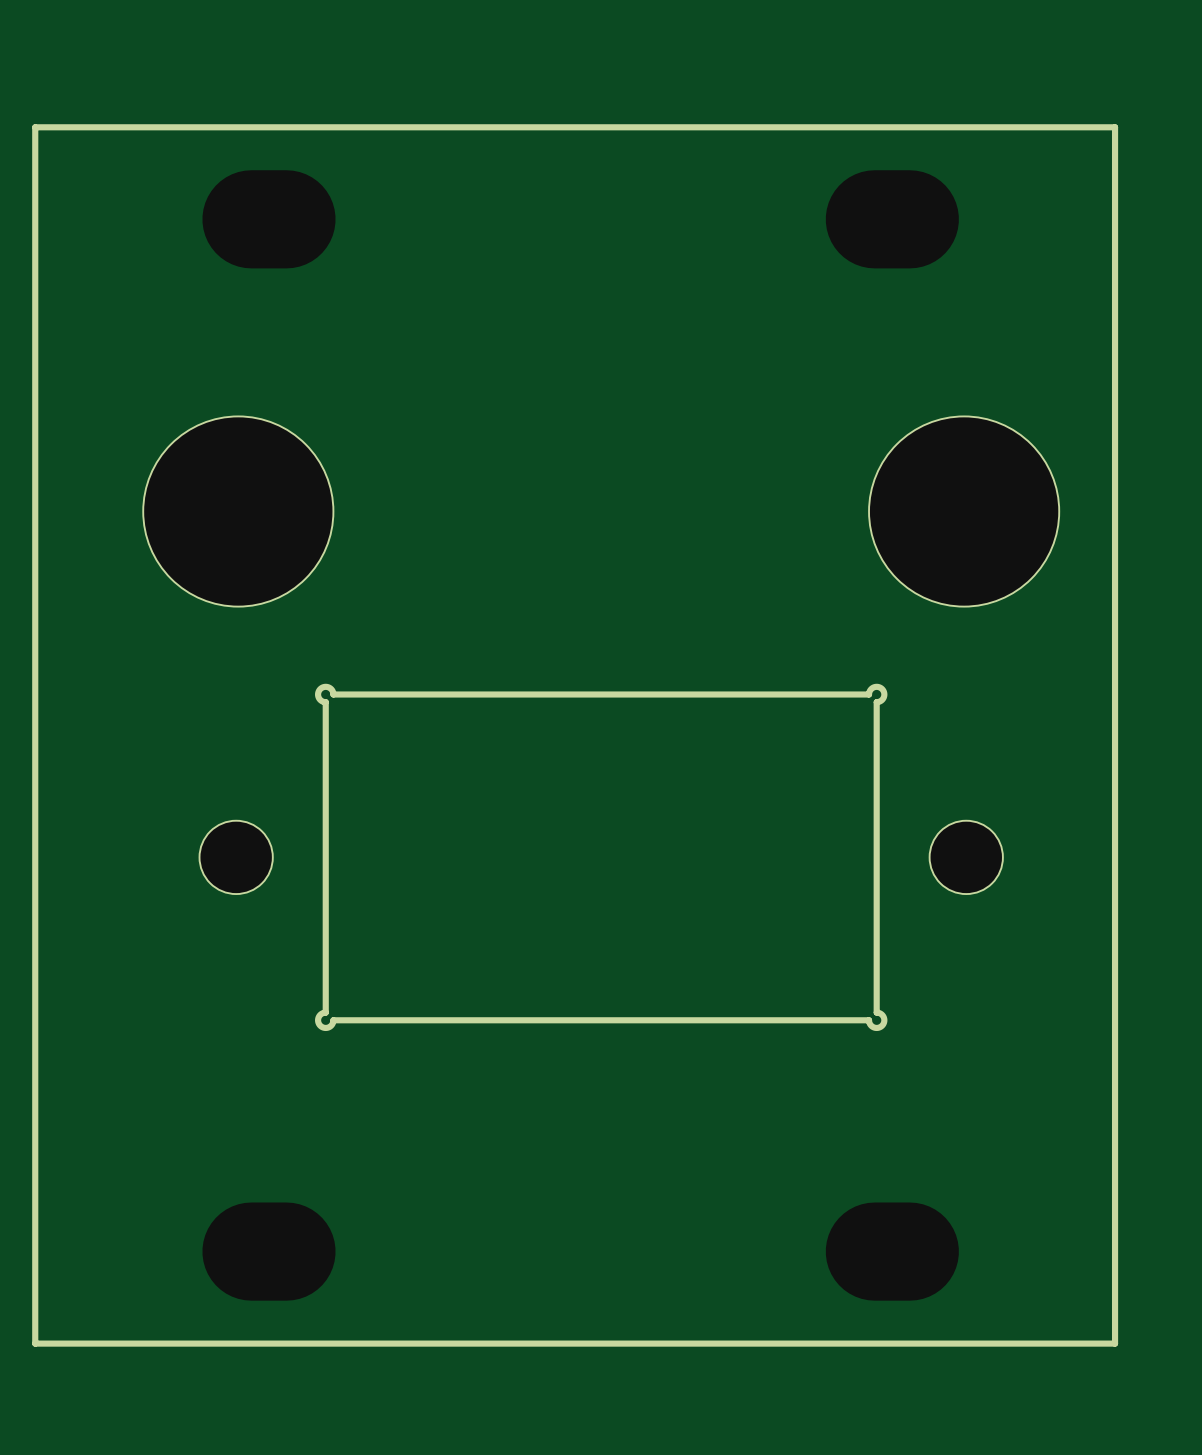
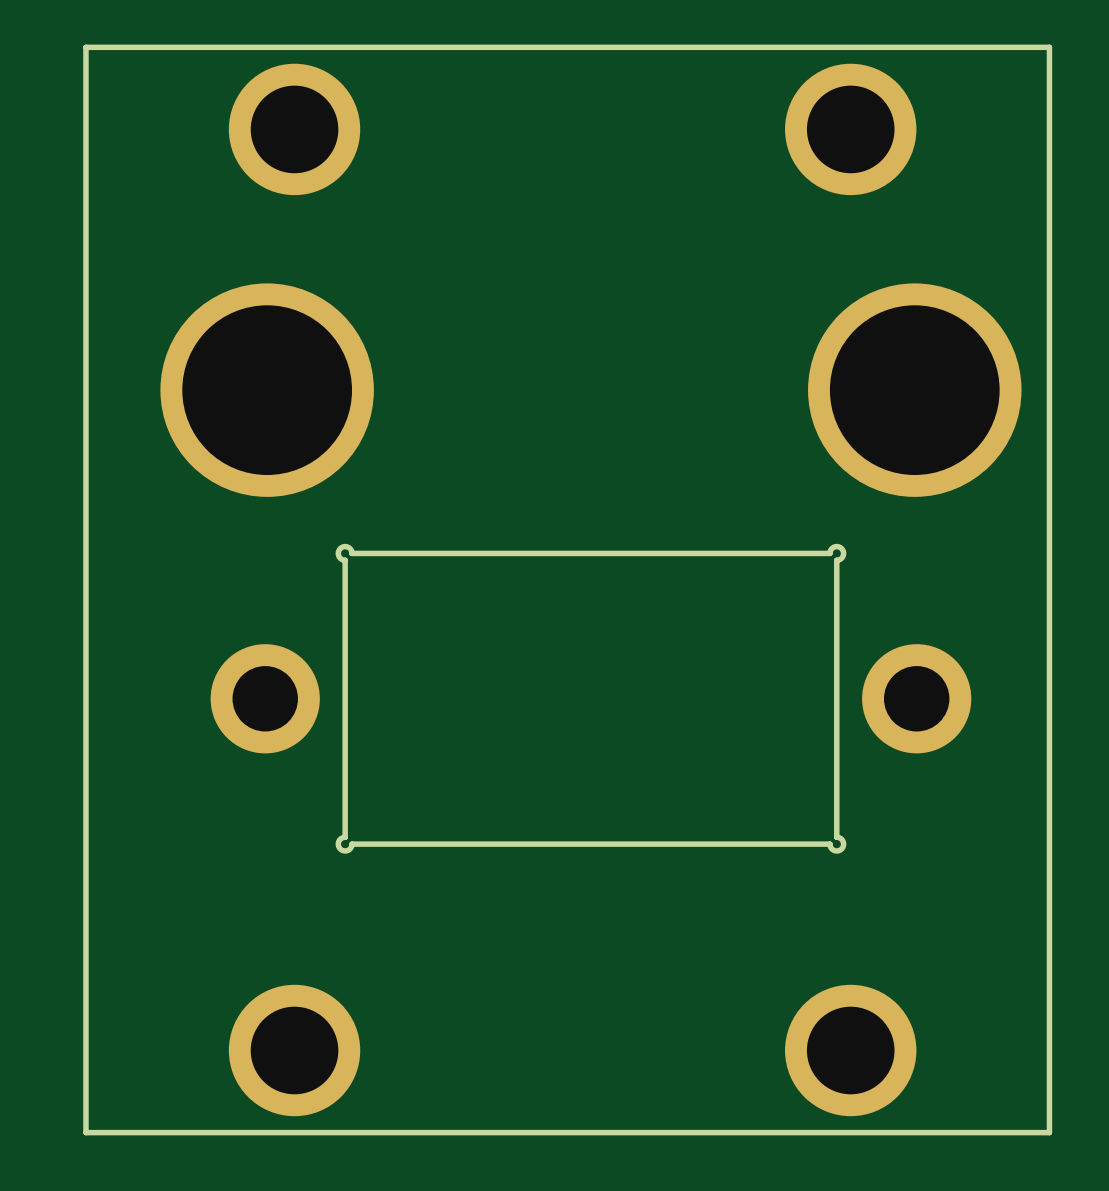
part footprint: [202, 170, 336, 269] -> [228, 63, 361, 196]
part footprint: [825, 170, 959, 269] -> [785, 63, 917, 196]
part footprint: [143, 416, 334, 607] -> [160, 283, 374, 497]
part footprint: [869, 416, 1060, 607] -> [808, 283, 1022, 497]
part footprint: [199, 683, 1003, 1032] -> [210, 543, 972, 854]
part footprint: [202, 1202, 336, 1301] -> [228, 984, 361, 1117]
part footprint: [825, 1202, 959, 1301] -> [785, 984, 917, 1117]

